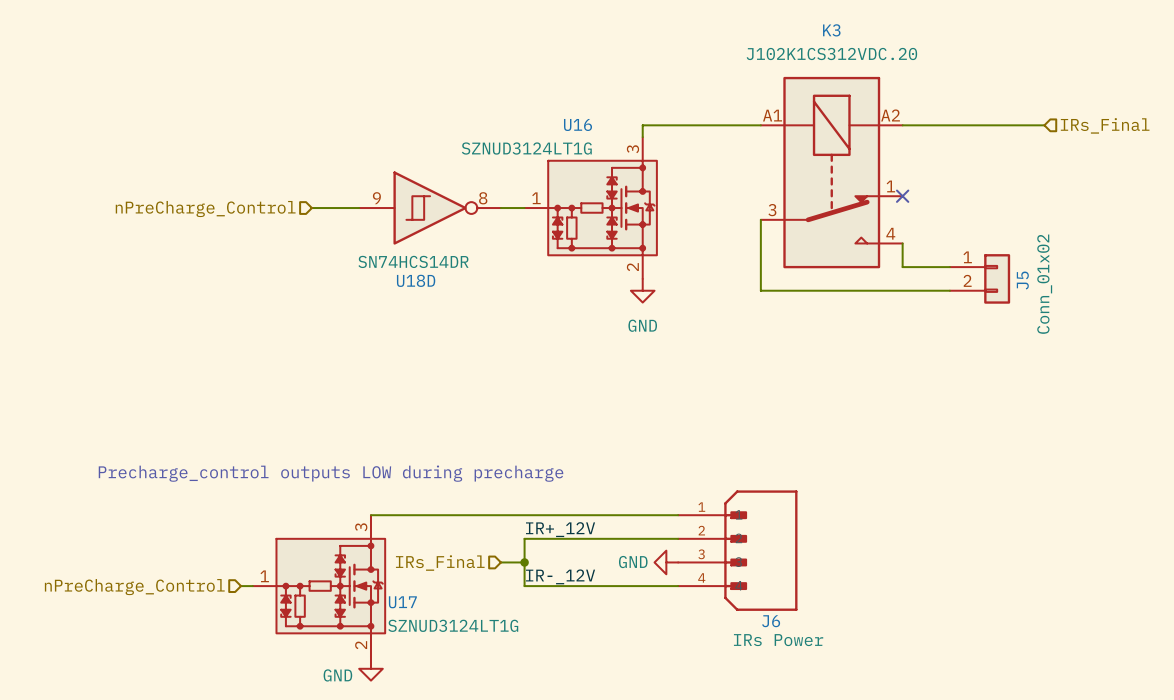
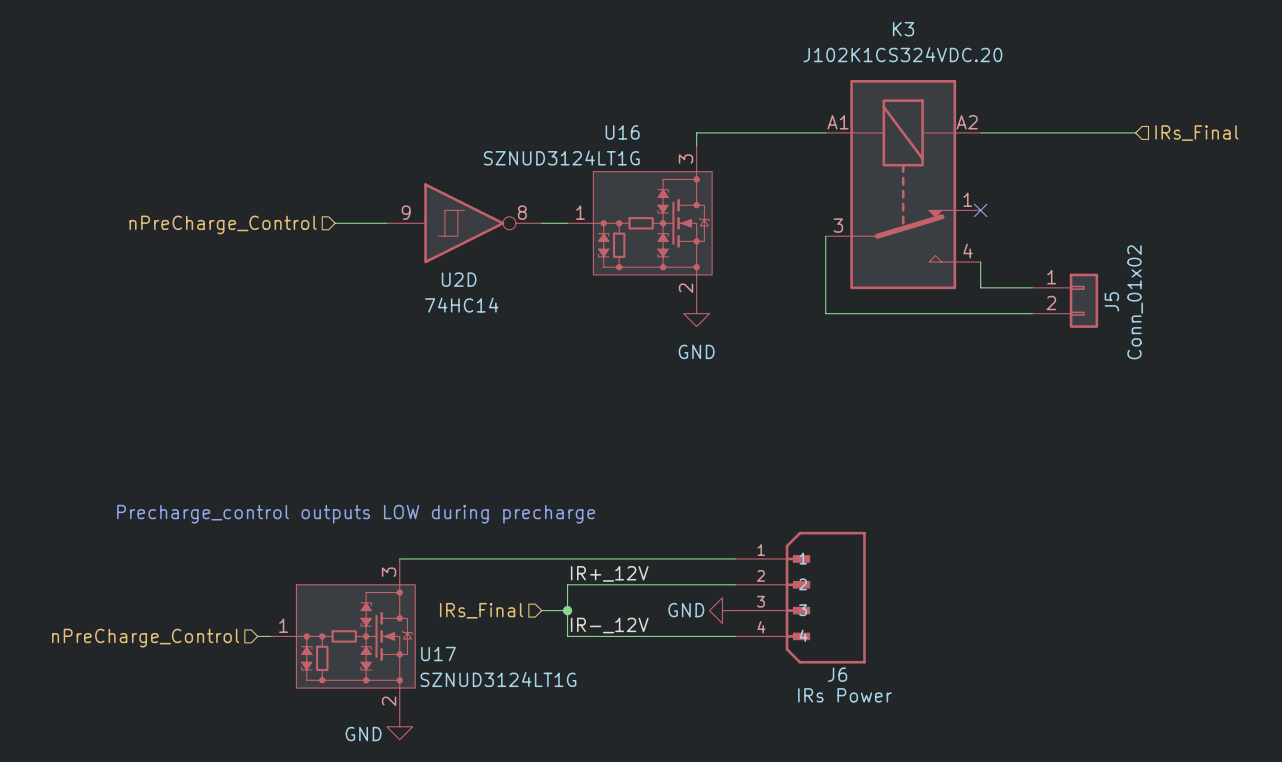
K3 value: J102K1CS312VDC.20 (831, 54) -> J102K1CS324VDC.20 (902, 54)
U18D value: SN74HCS14DR (413, 261) -> 74HC14 (461, 305)
U18D name: U18D (416, 280) -> U2D (459, 279)

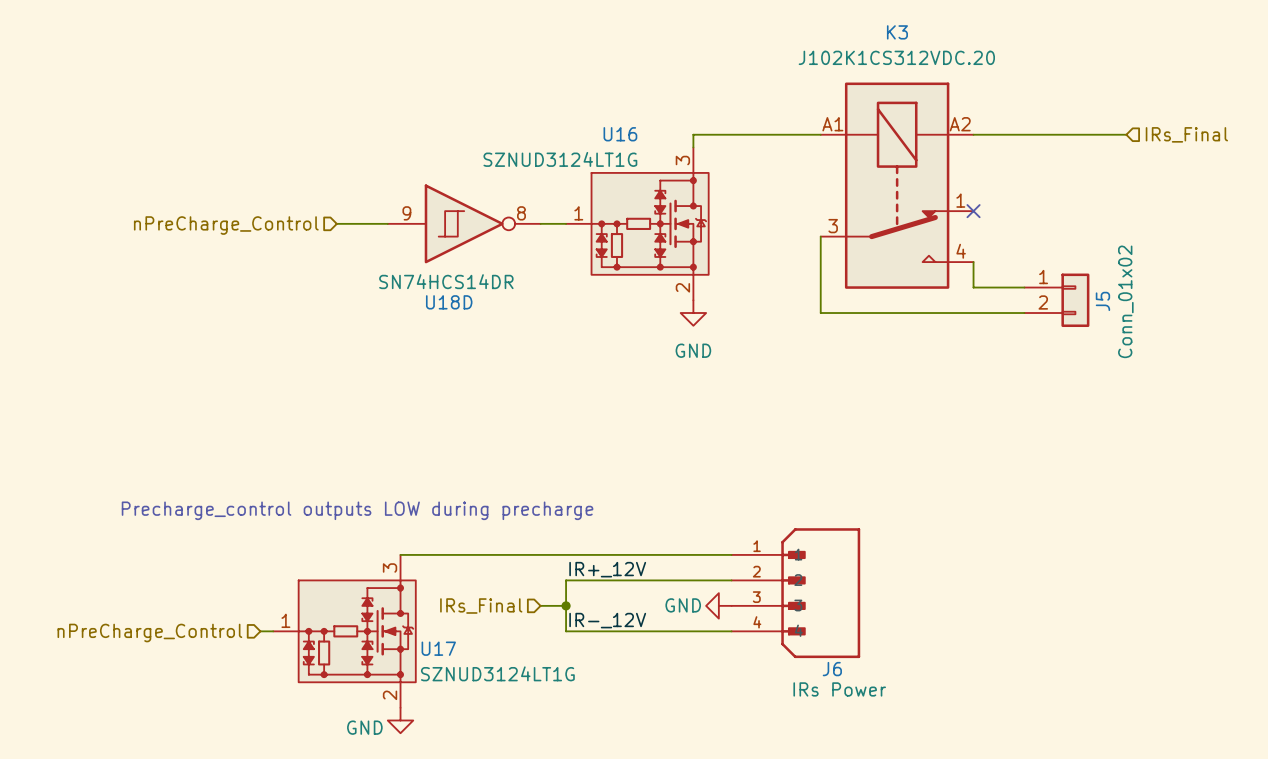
K3 value: J102K1CS324VDC.20 (902, 54) -> J102K1CS312VDC.20 (896, 57)
U2D name: U2D (459, 279) -> U18D (449, 302)
U2D value: 74HC14 (461, 305) -> SN74HCS14DR (446, 281)

